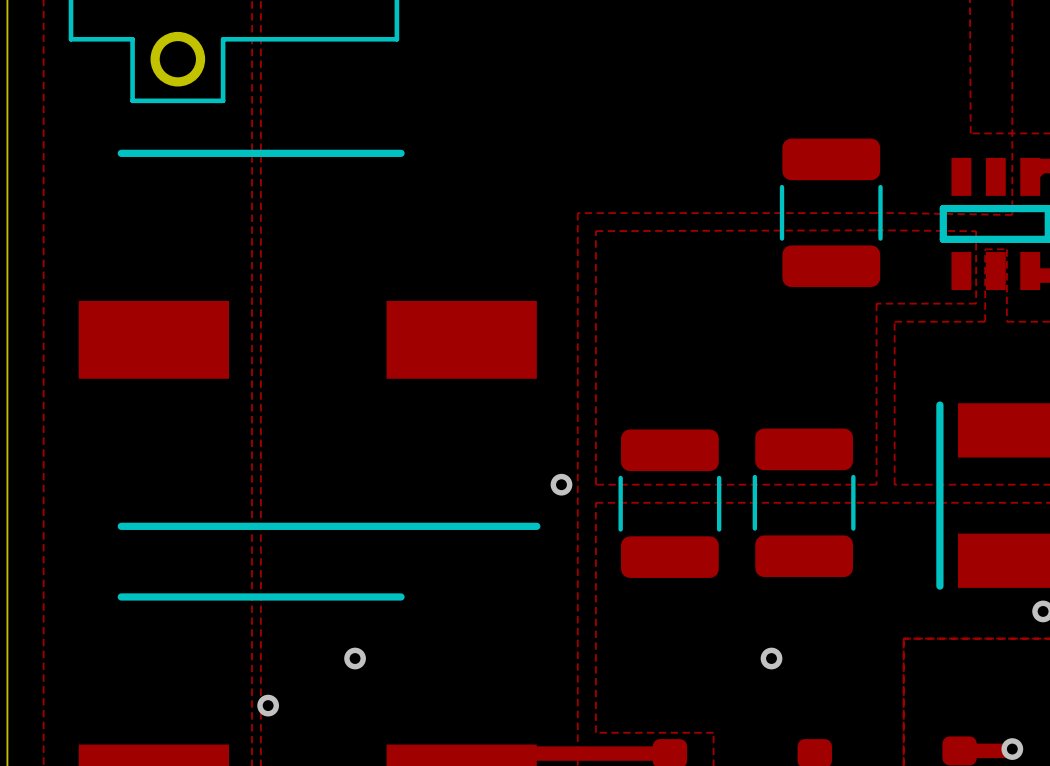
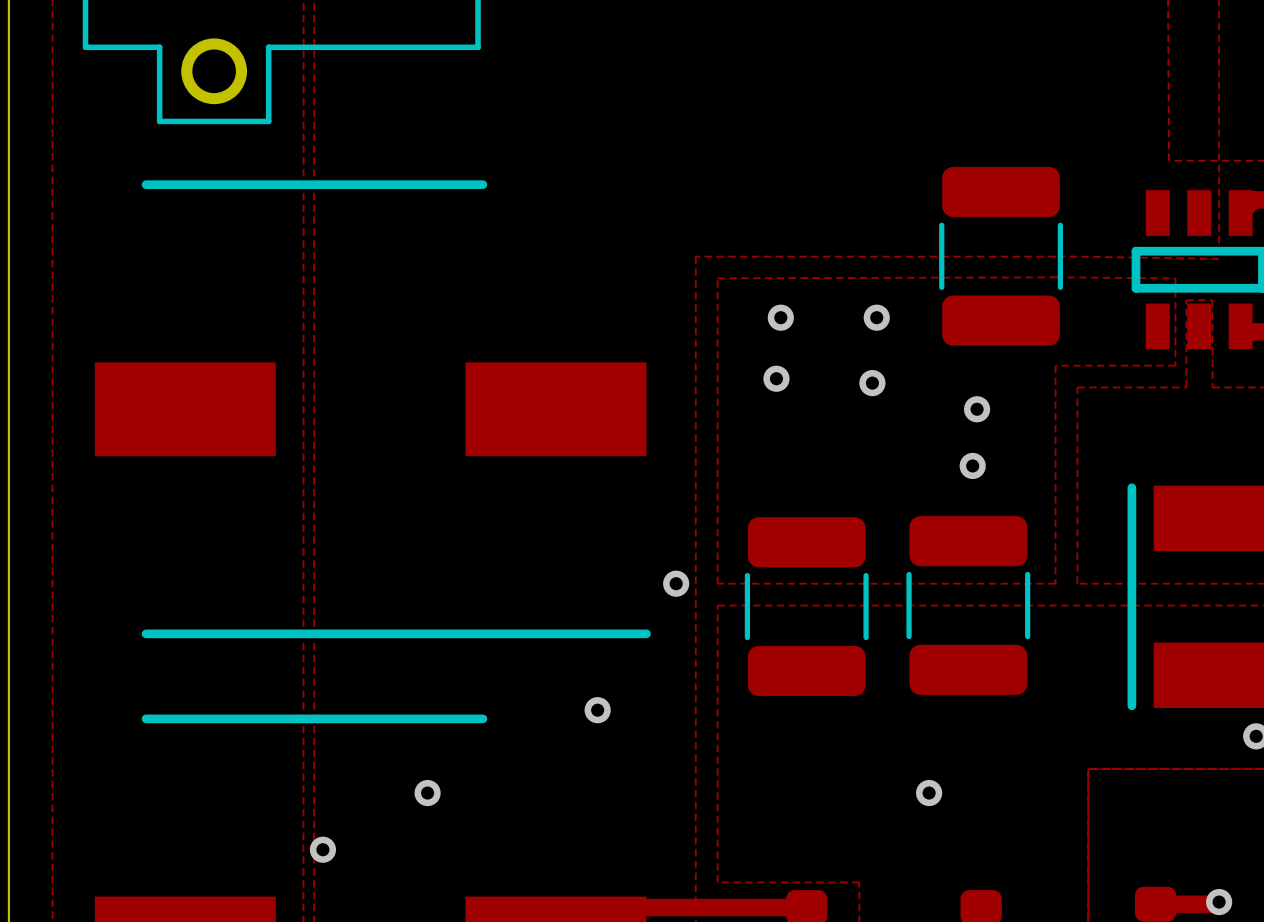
via: none -> (780, 317)
via: none -> (876, 317)
via: none -> (776, 378)
via: none -> (872, 383)
via: none -> (977, 409)
via: none -> (972, 465)
via: none -> (597, 710)

